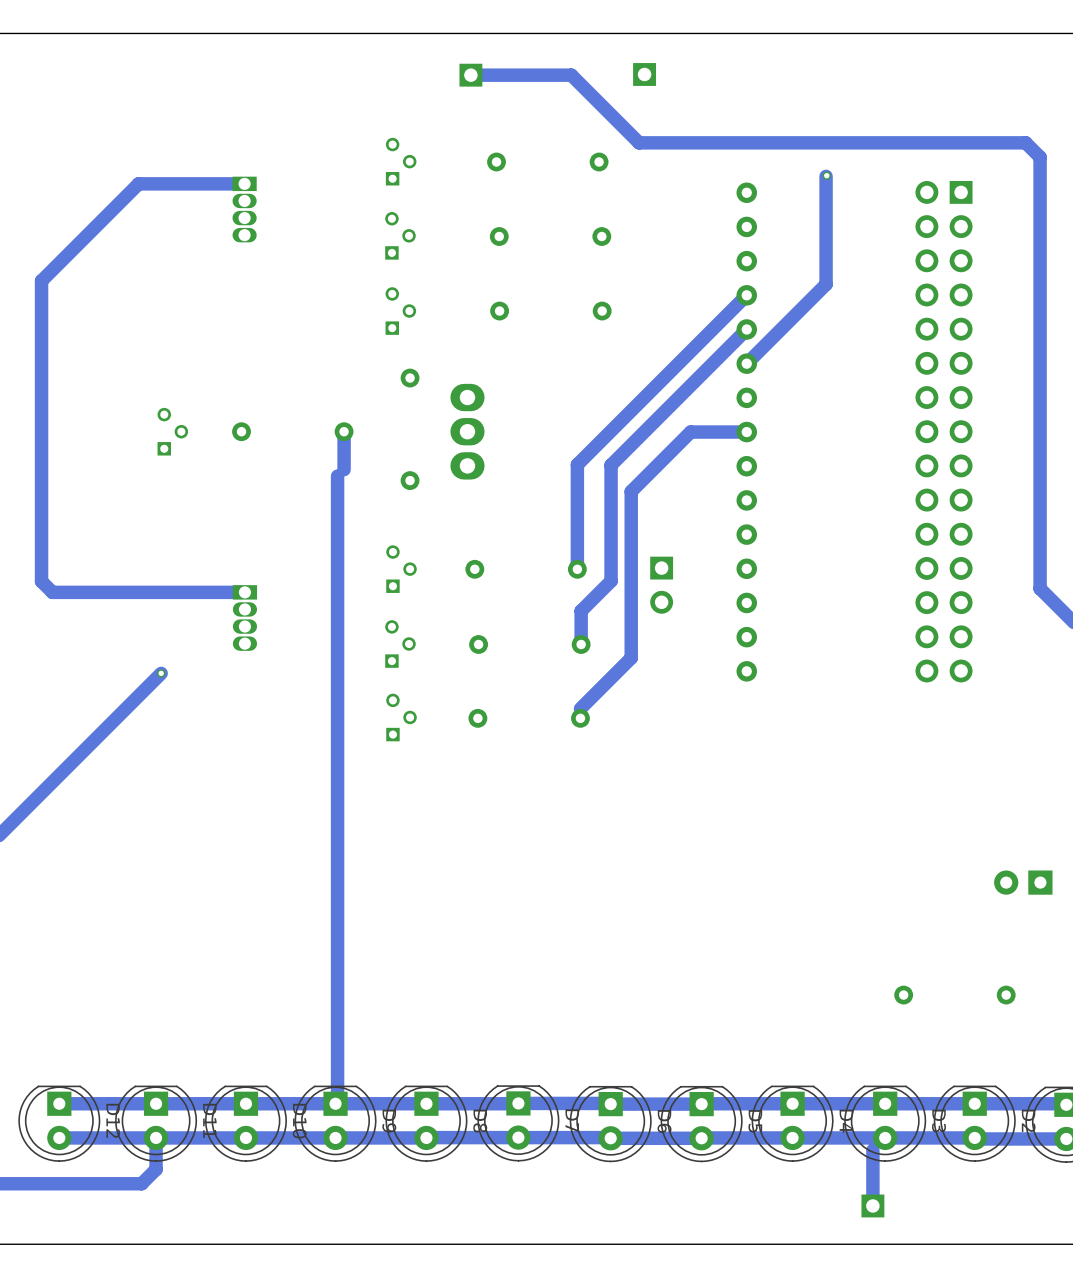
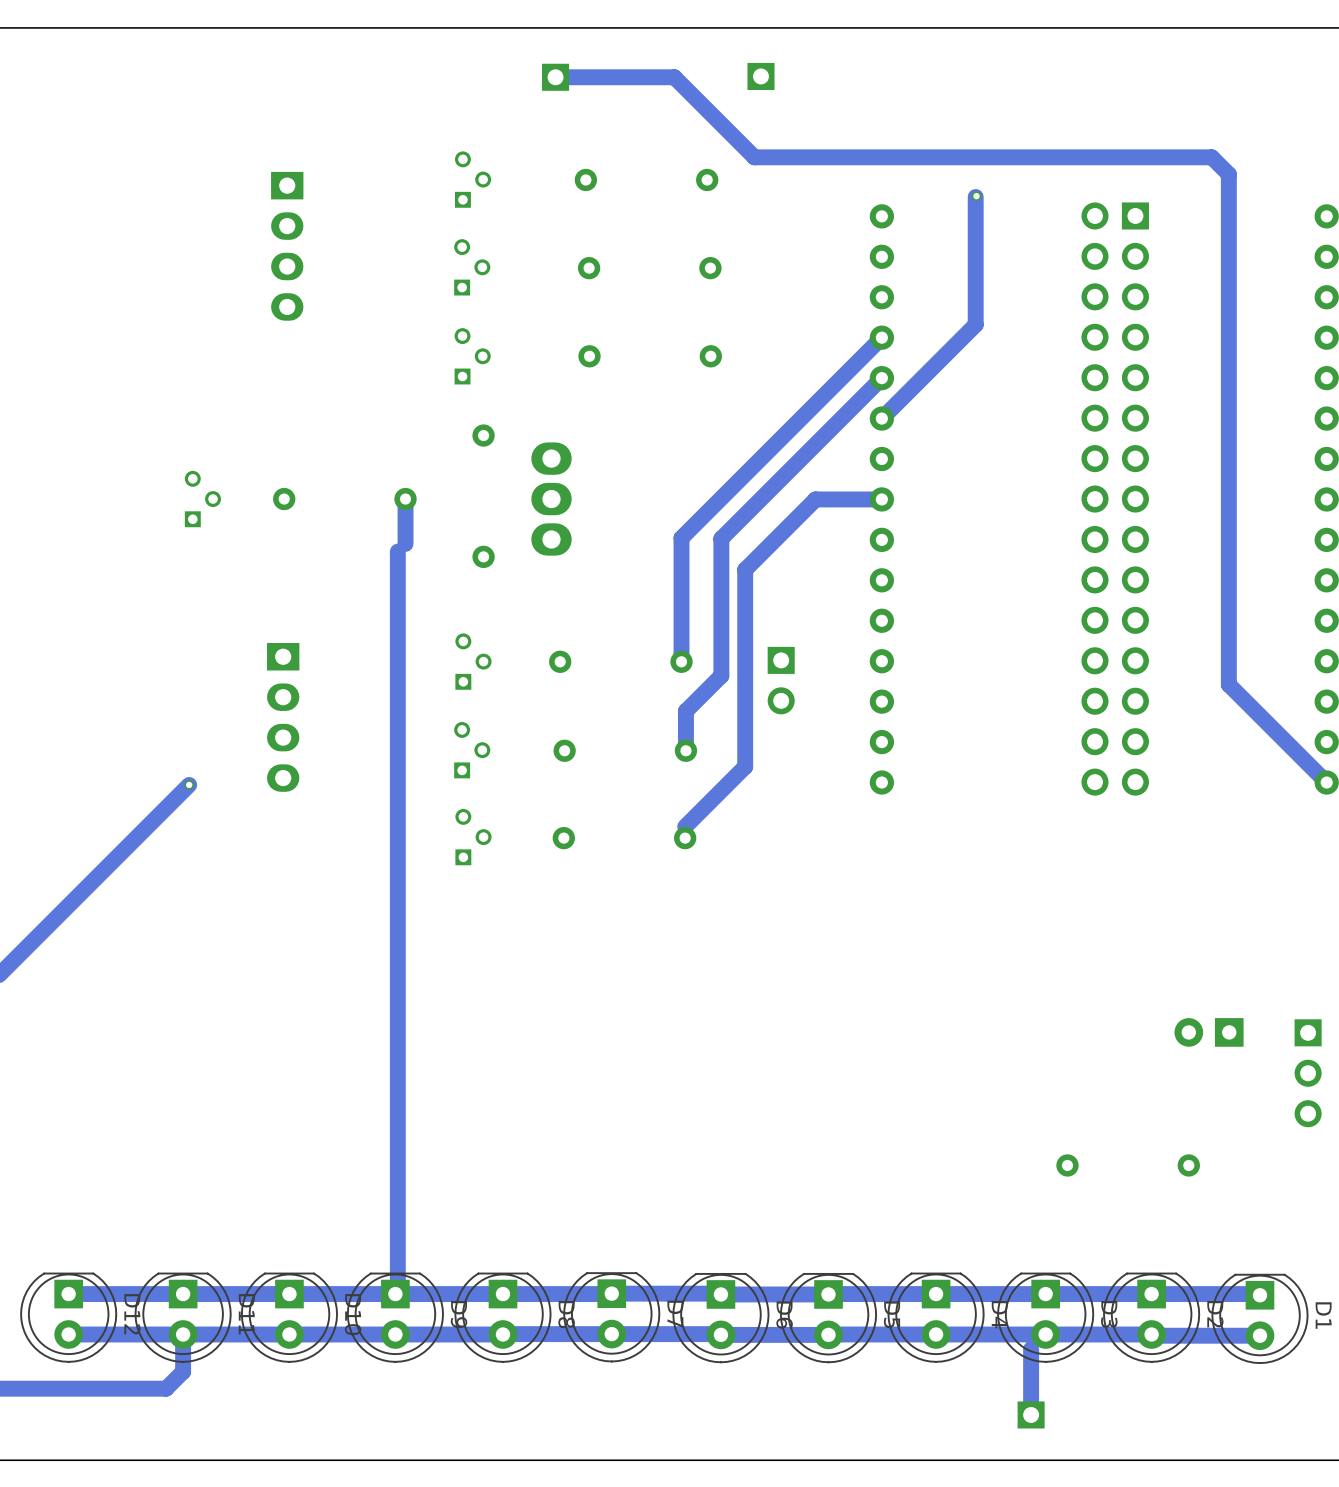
part footprint: [232, 176, 257, 243] -> [271, 171, 304, 321]
track: (244, 183) (138, 183) (41, 280) (41, 581) (52, 592) (244, 592) -> none
part footprint: [232, 585, 258, 651] -> [267, 643, 300, 792]

